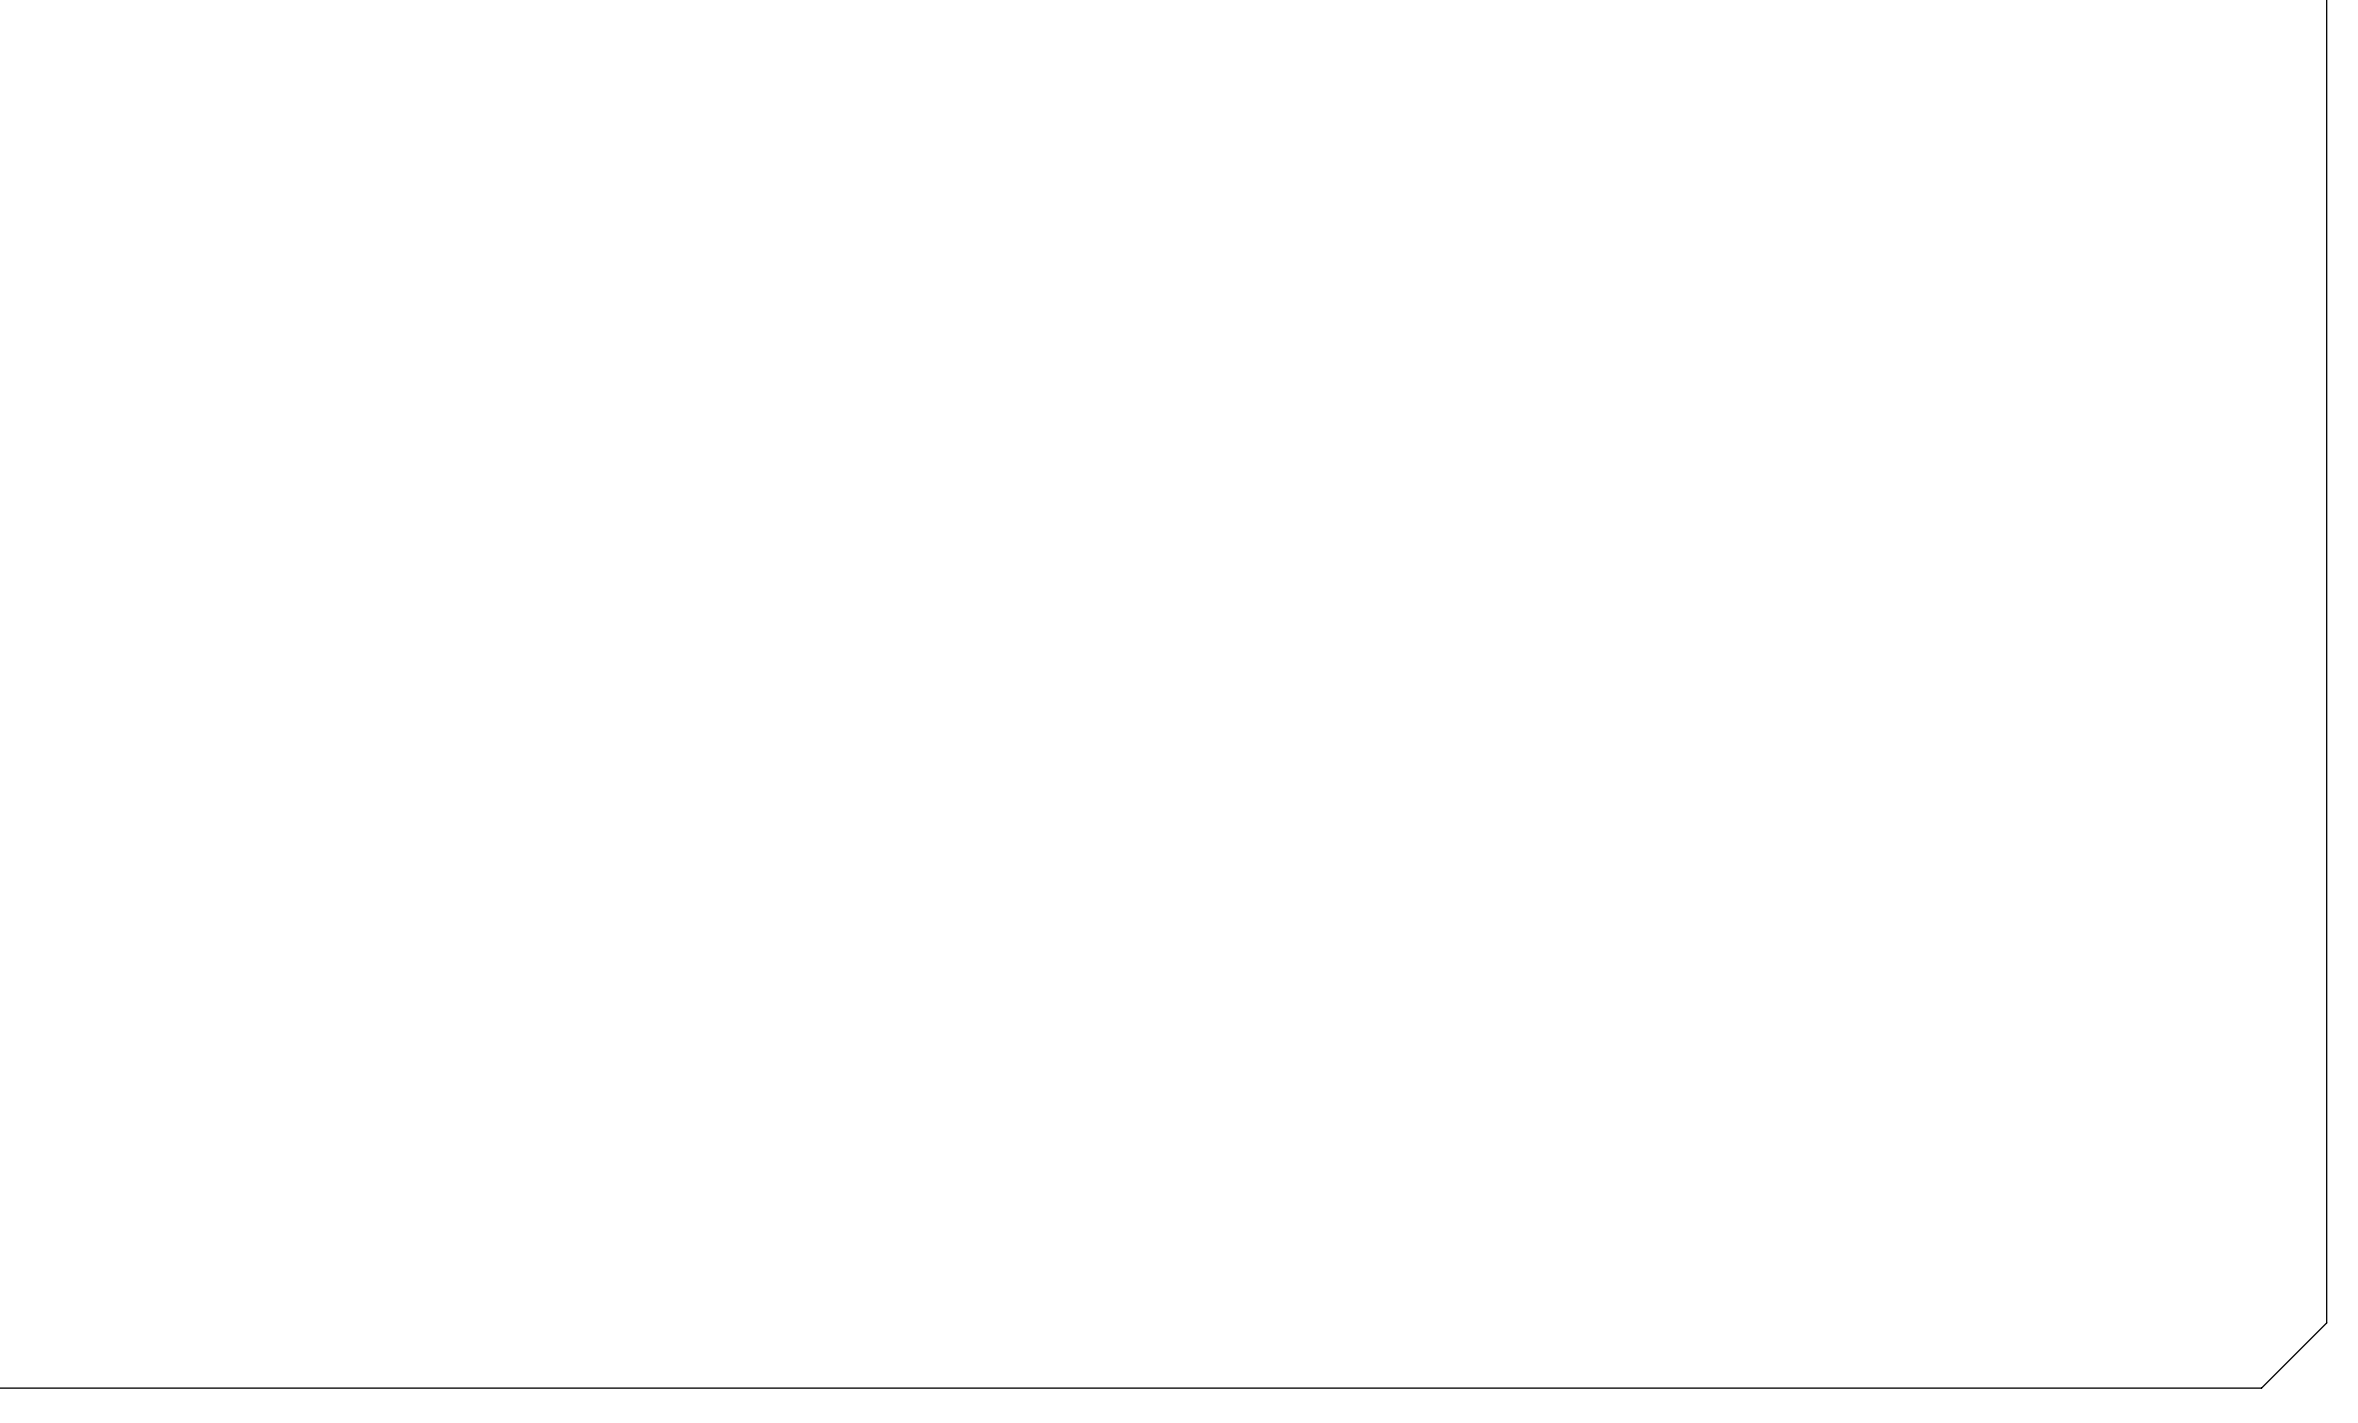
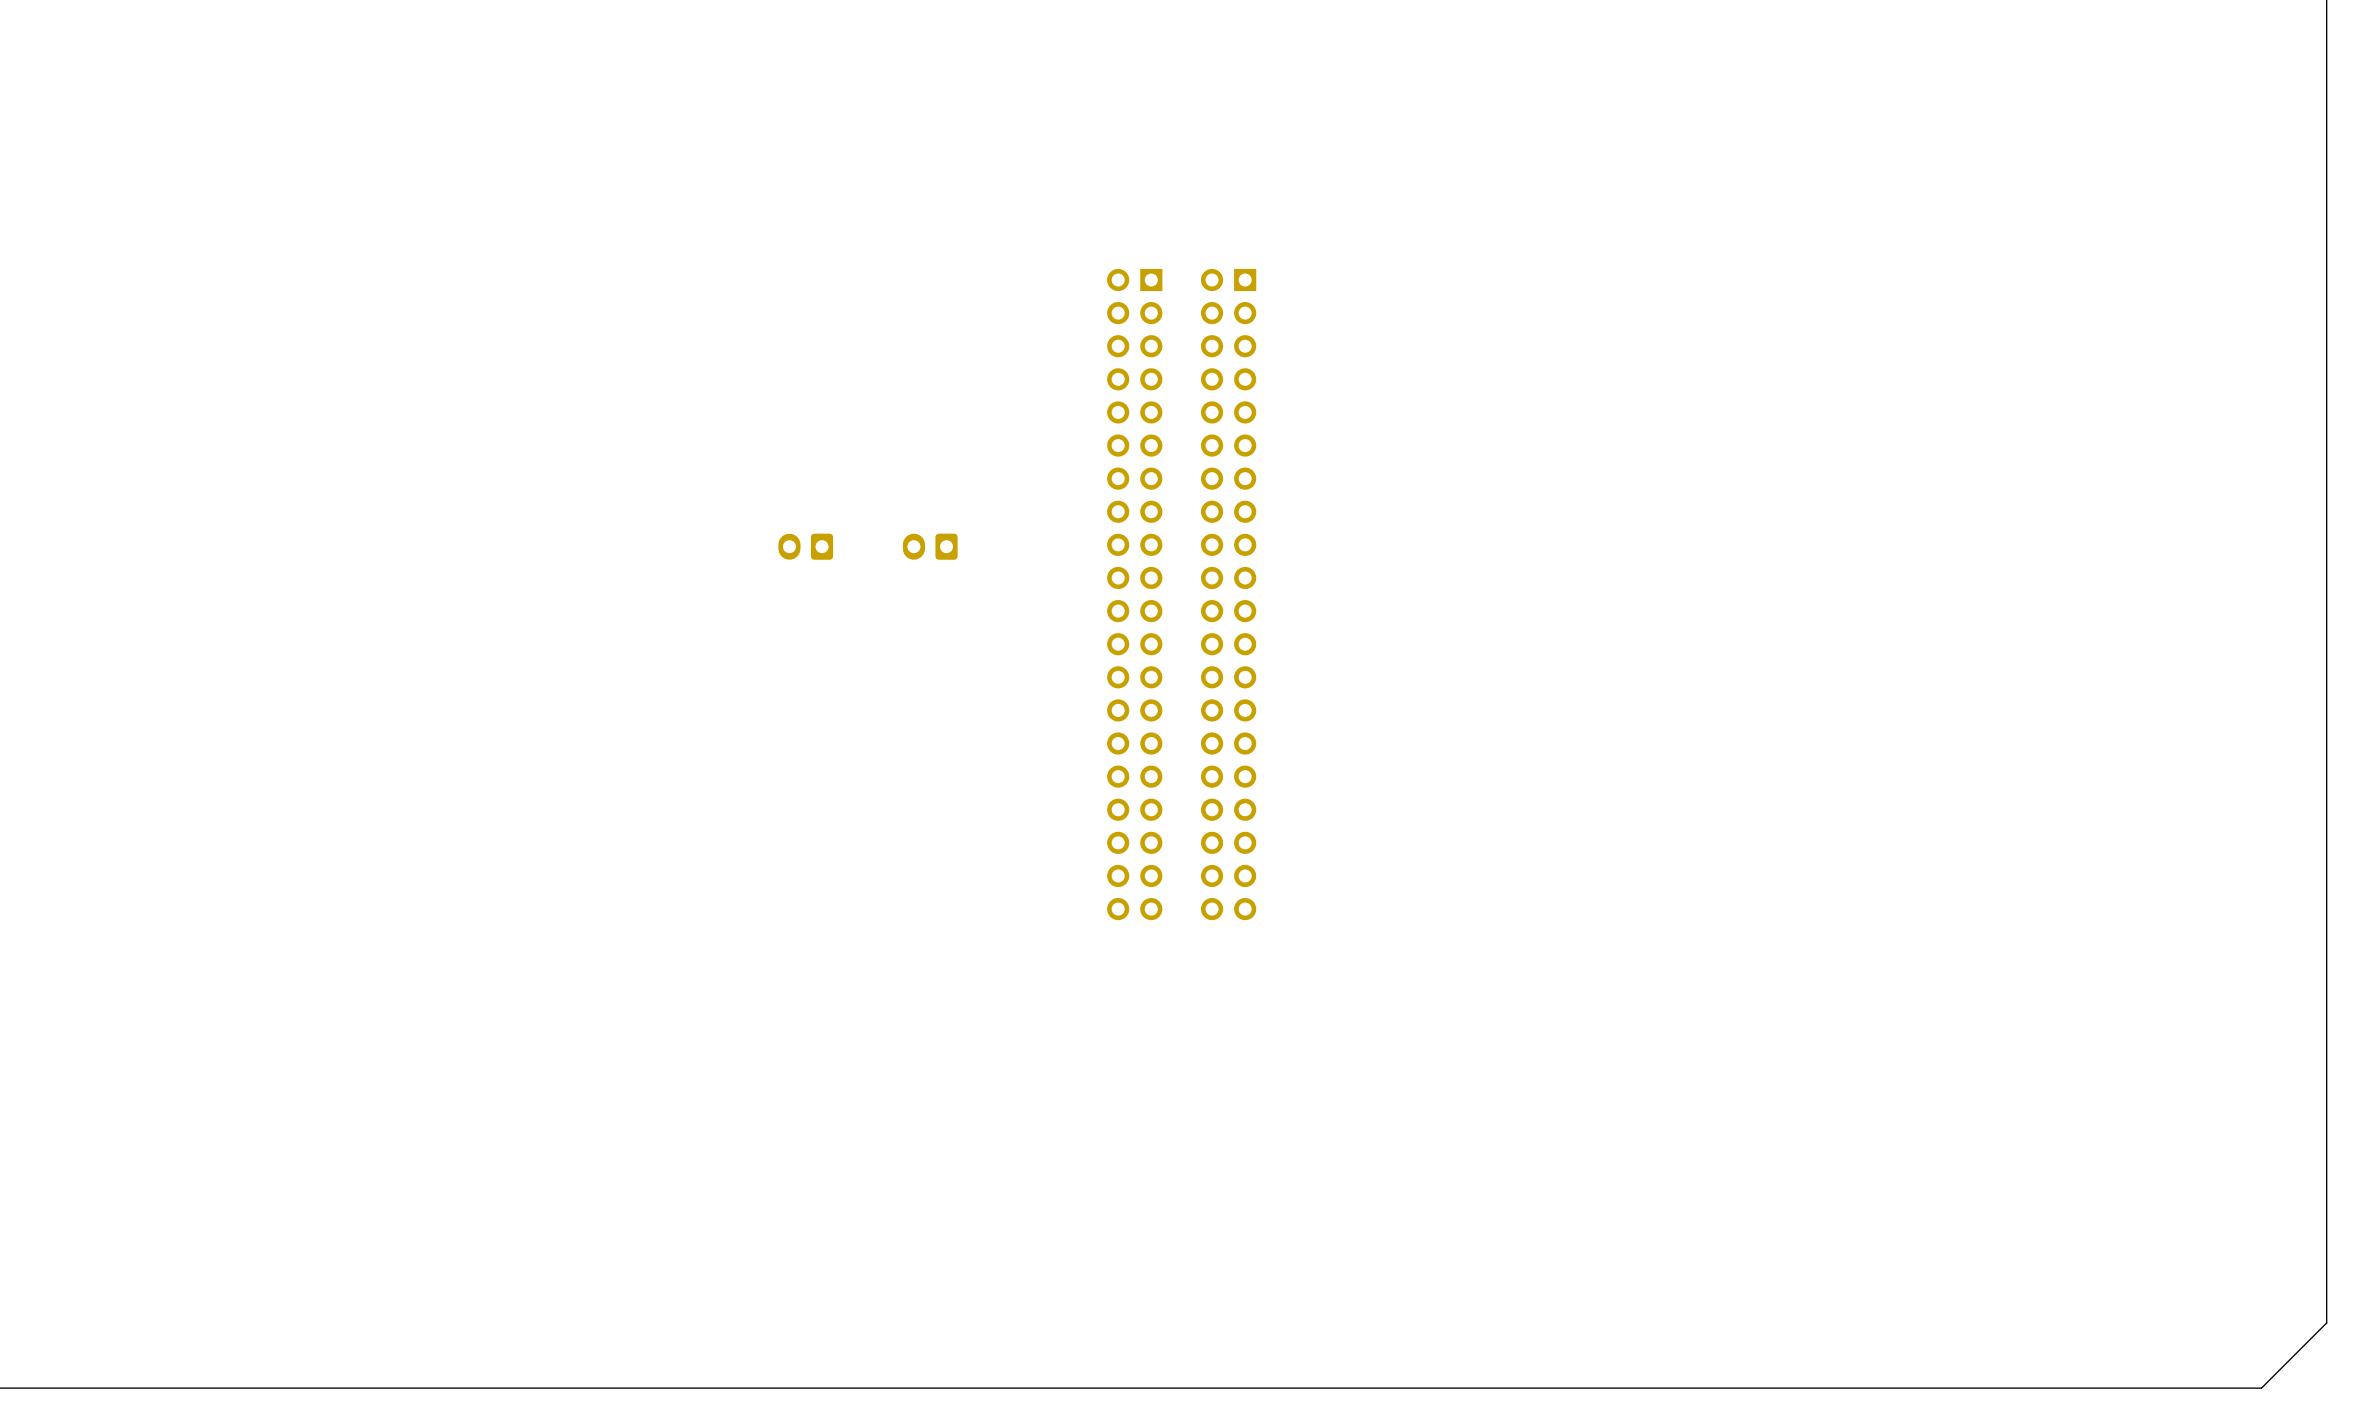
part: none -> (805, 546)
part: none -> (930, 546)
part: none -> (1134, 594)
part: none -> (1228, 594)

